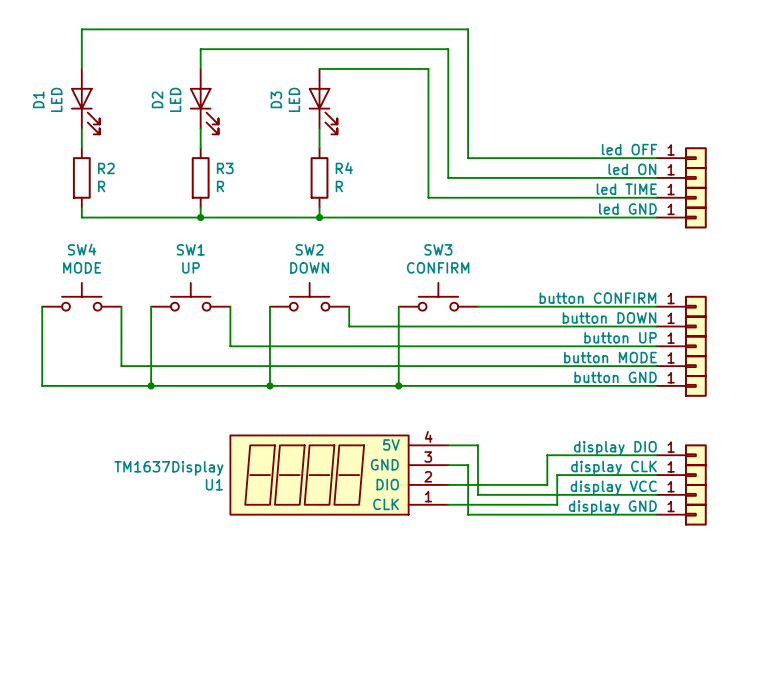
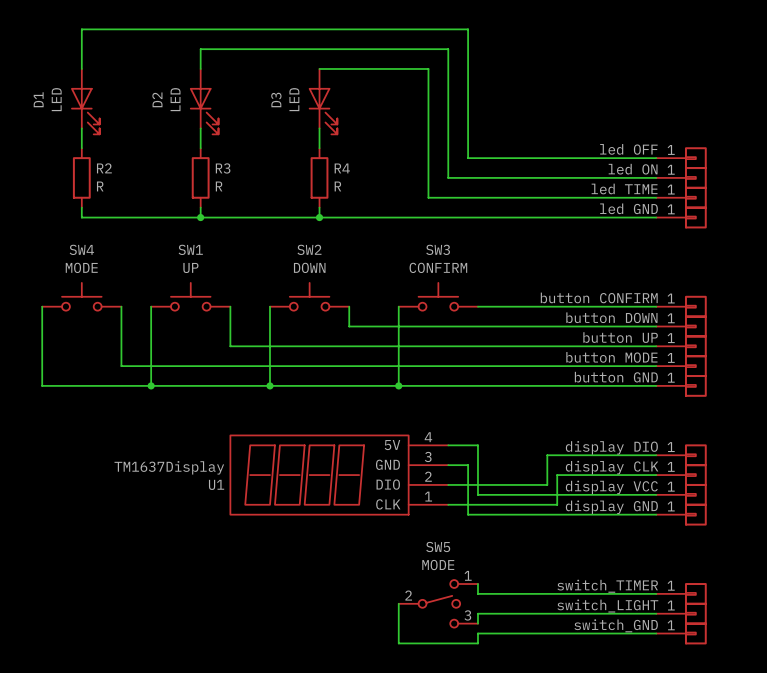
wire: none -> (477, 584) (477, 593) (656, 593)
part: none -> switch_TIMER (681, 593)
wire: none -> (398, 603) (398, 643) (477, 643) (477, 633) (656, 633)
SW5: none -> MODE (438, 603)
wire: none -> (656, 613) (477, 613) (477, 623)
part: none -> switch_LIGHT (681, 613)
part: none -> switch_GND (681, 633)

